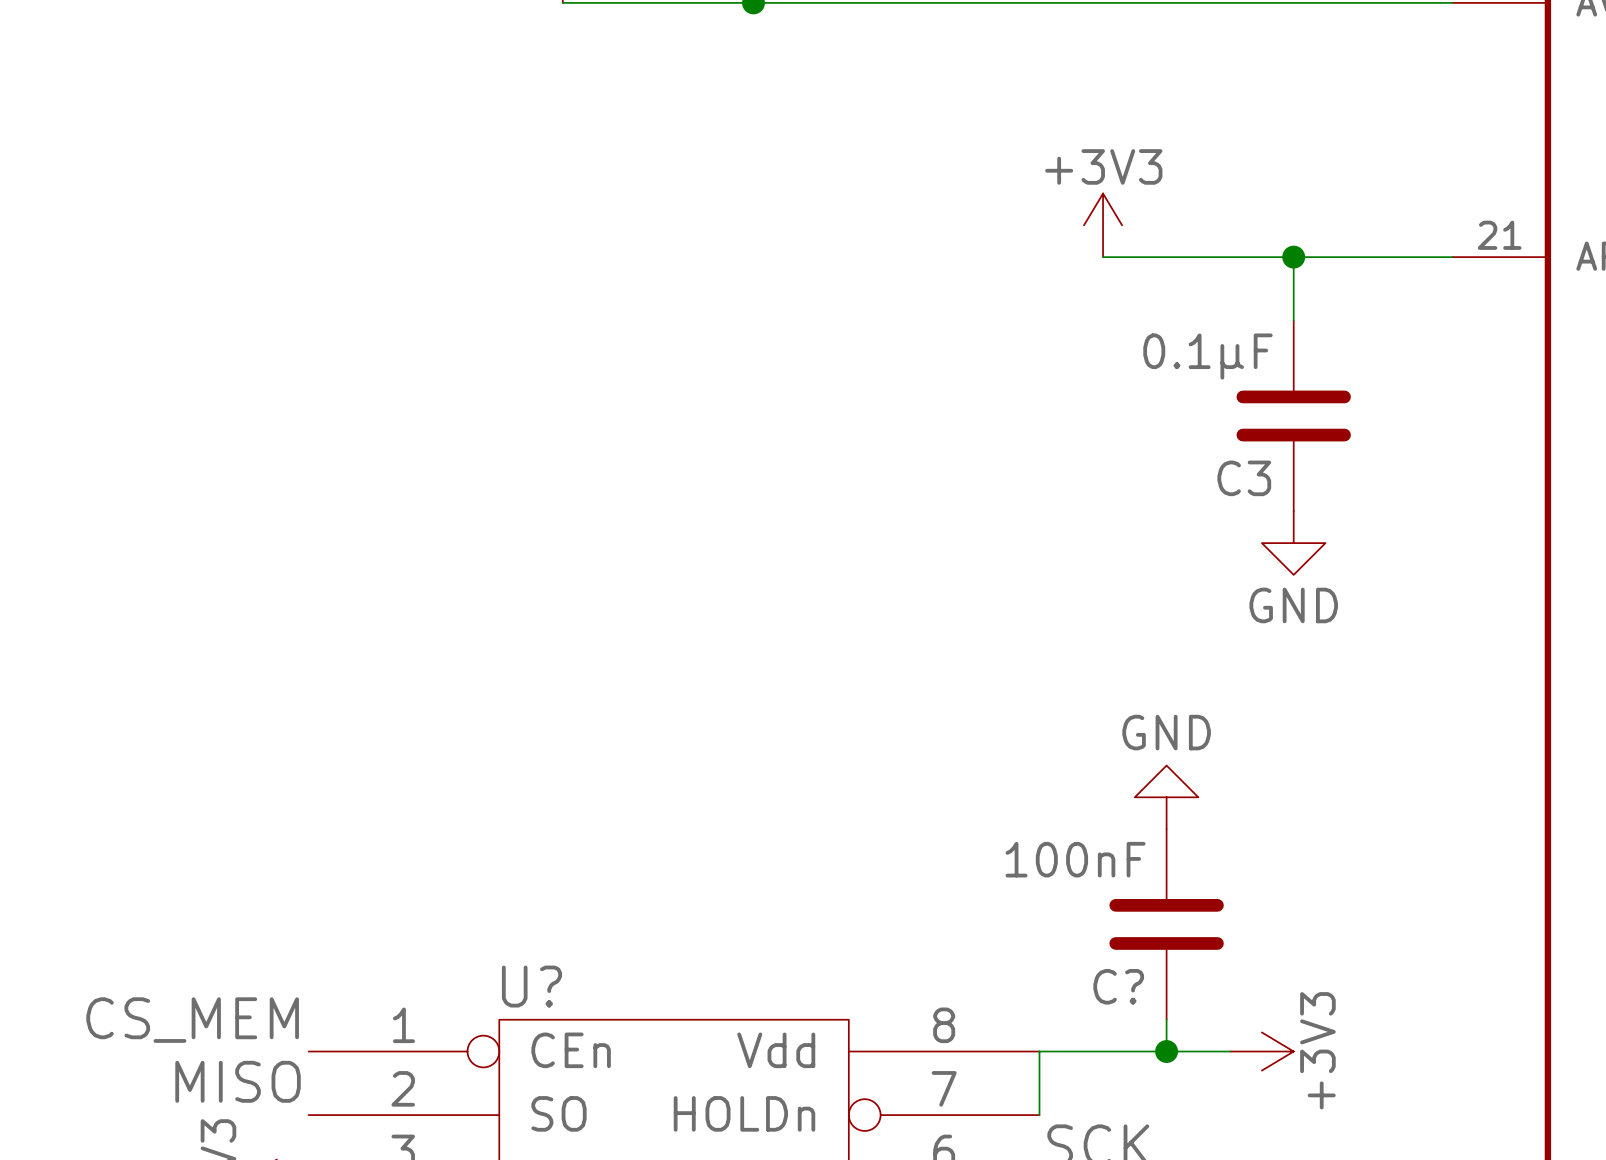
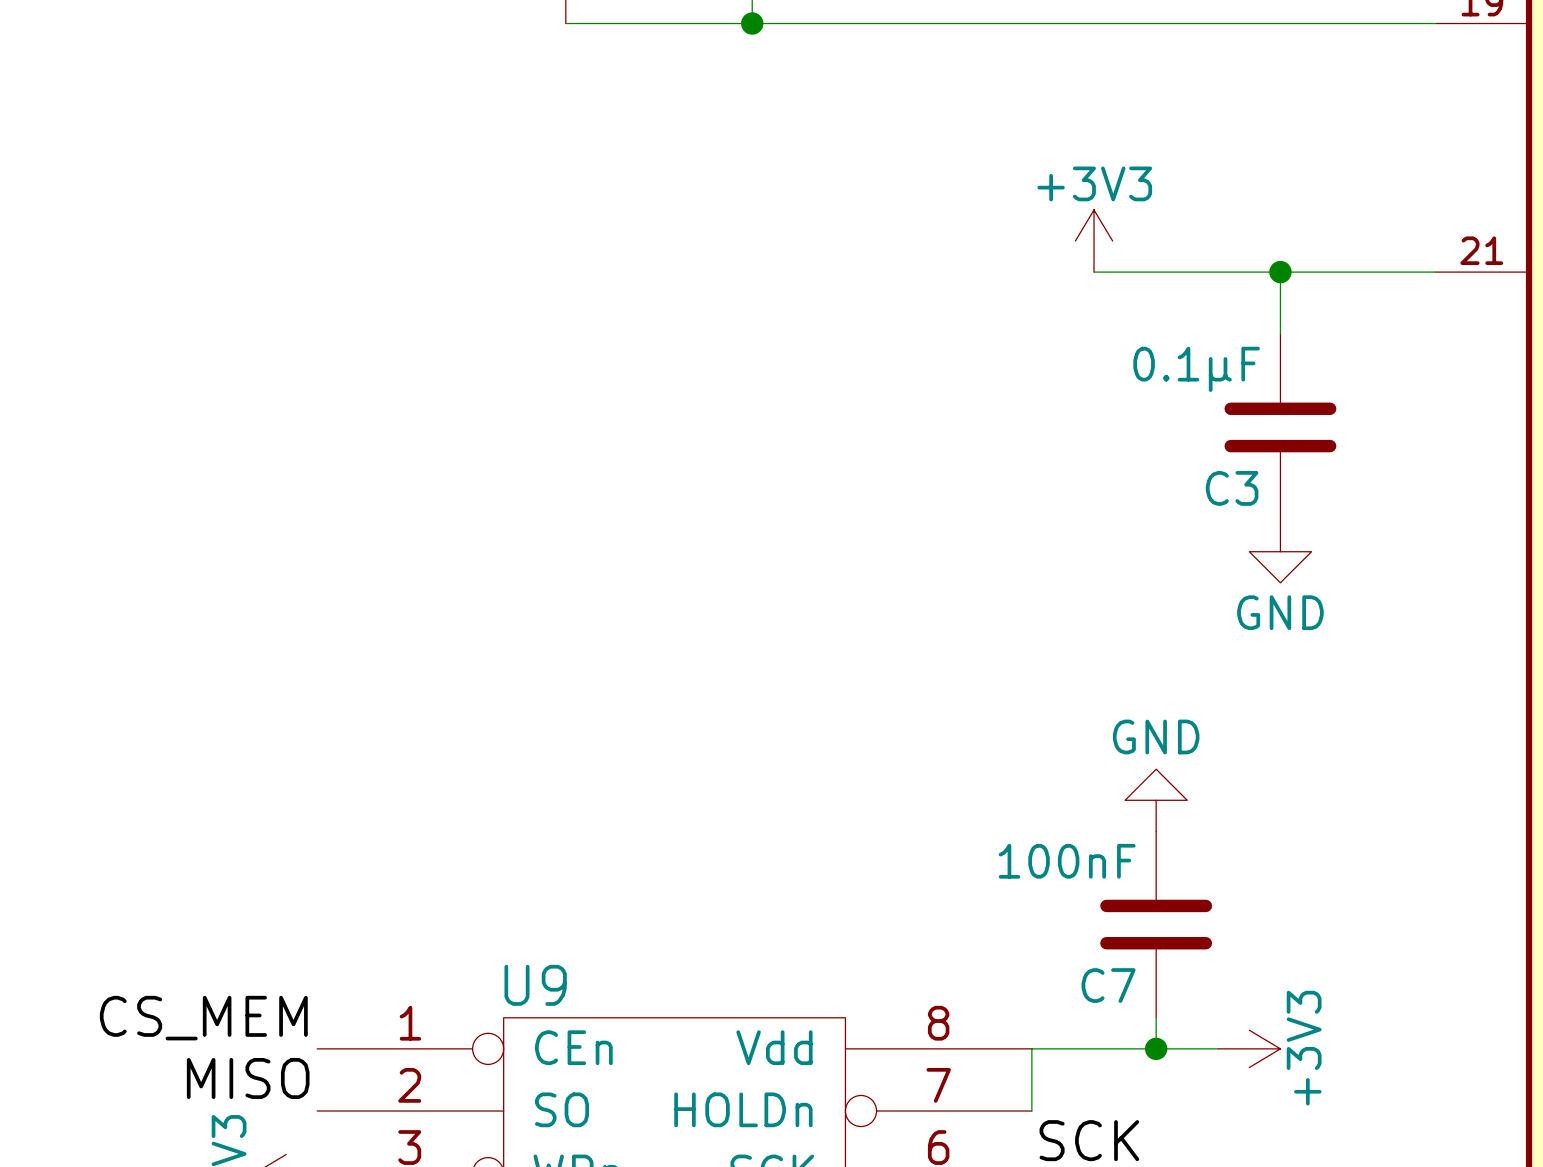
U? name: U? (531, 986) -> U9 (535, 985)
C? name: C? (1118, 986) -> C7 (1108, 985)

